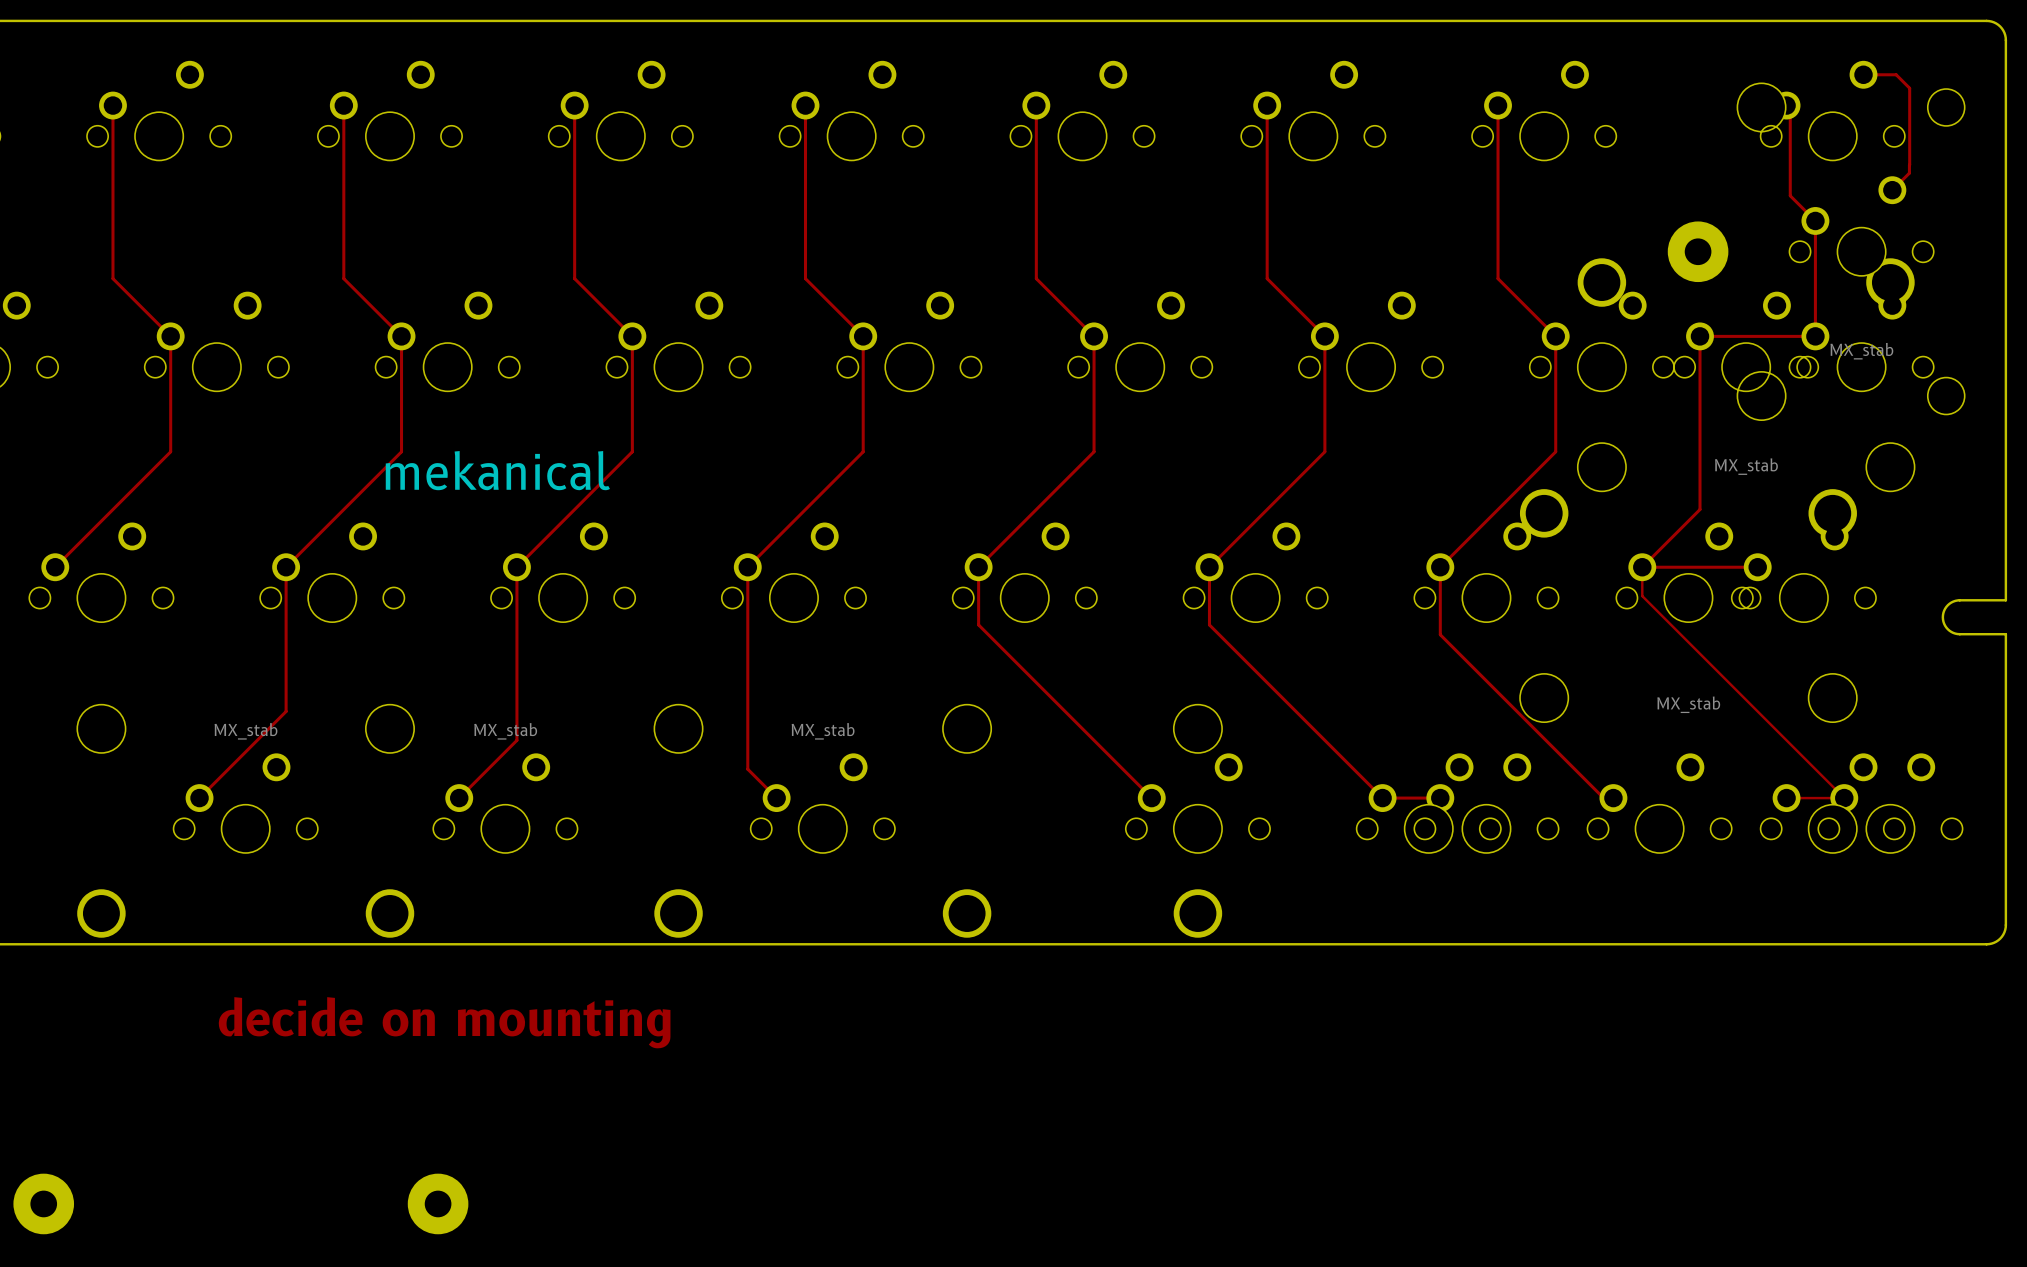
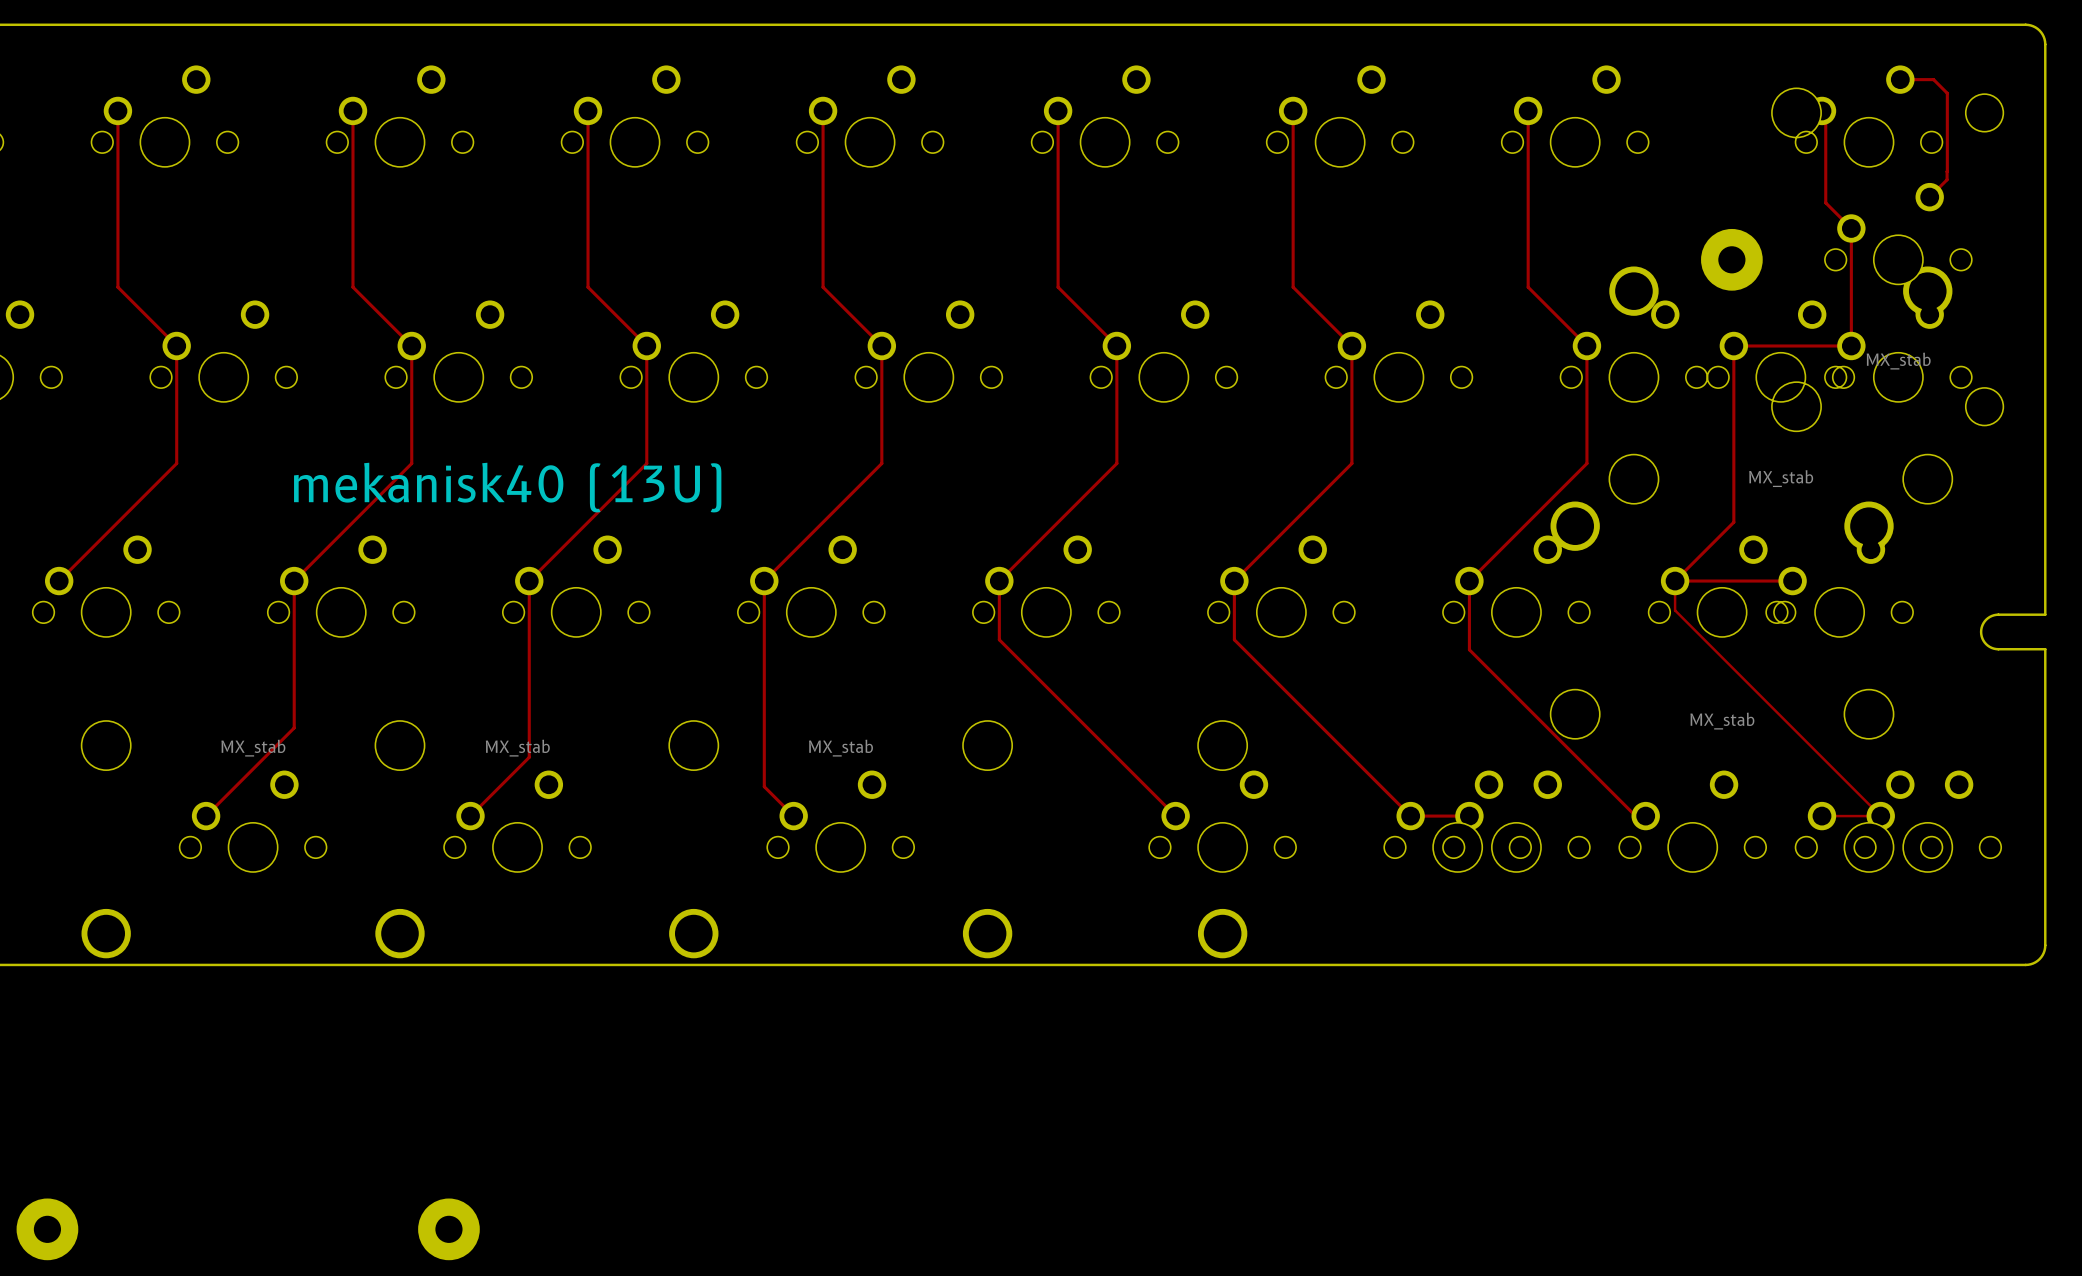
text: mekanical (497, 470) -> mekanisk40 (13U) (507, 487)
text: decide on mounting (444, 1022) -> none

